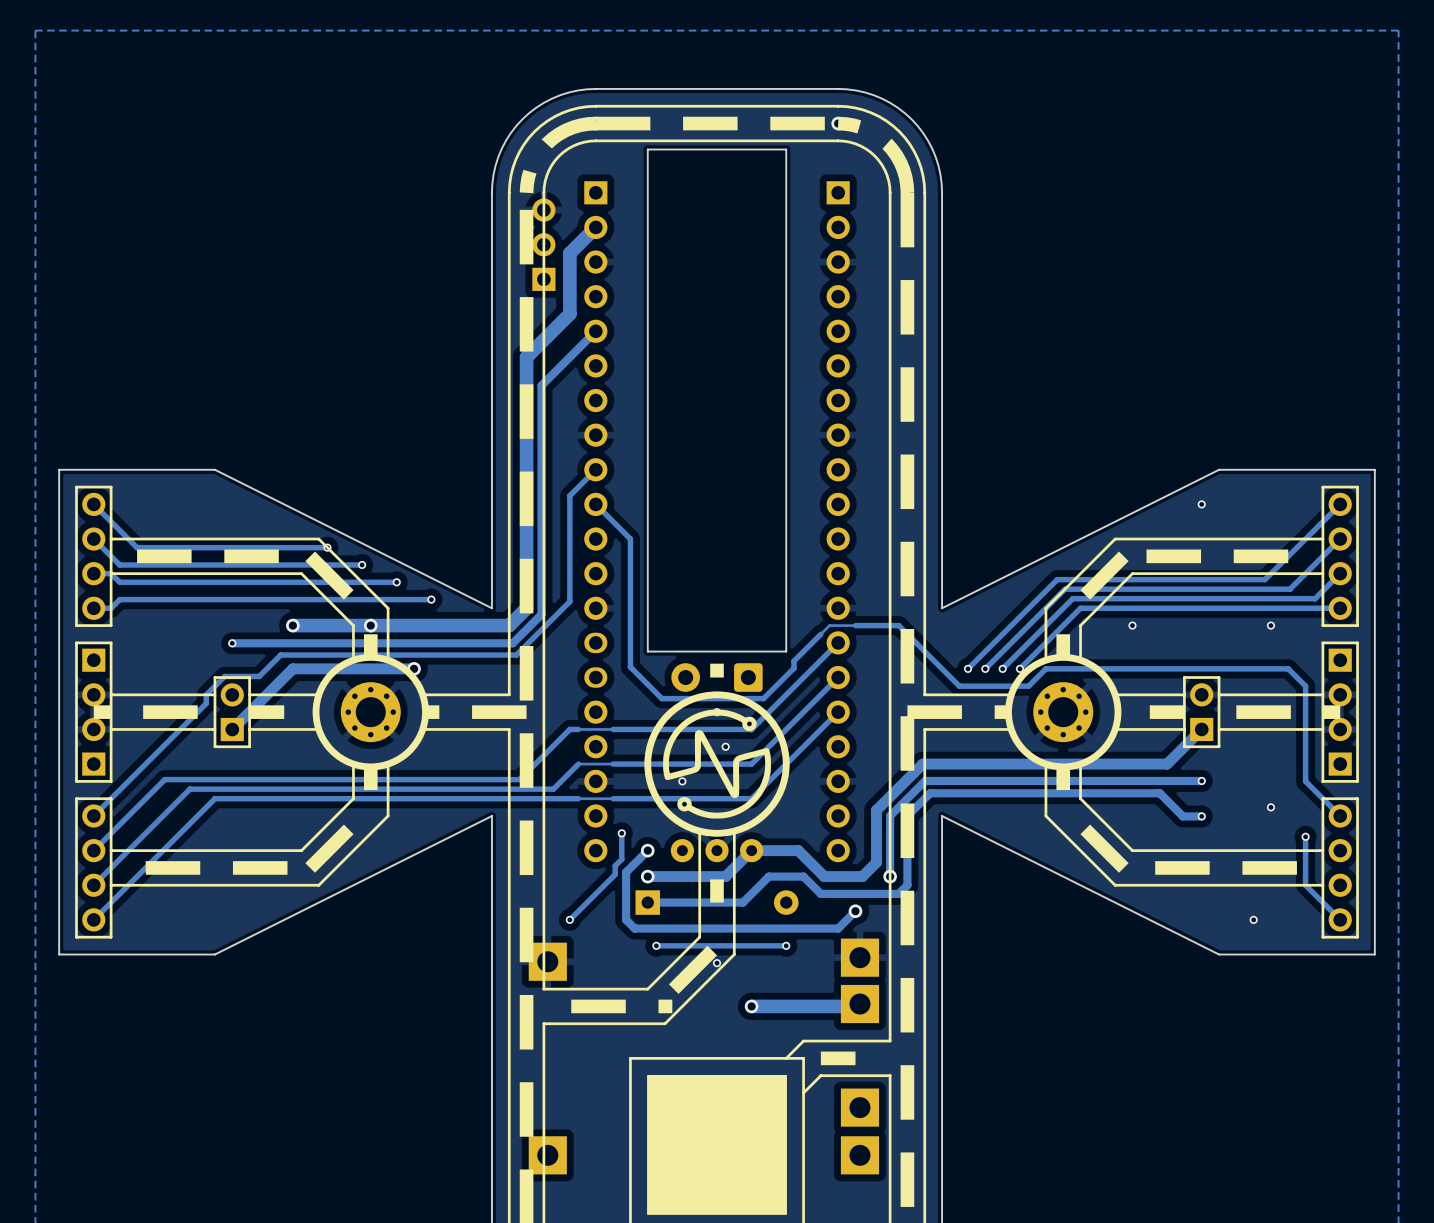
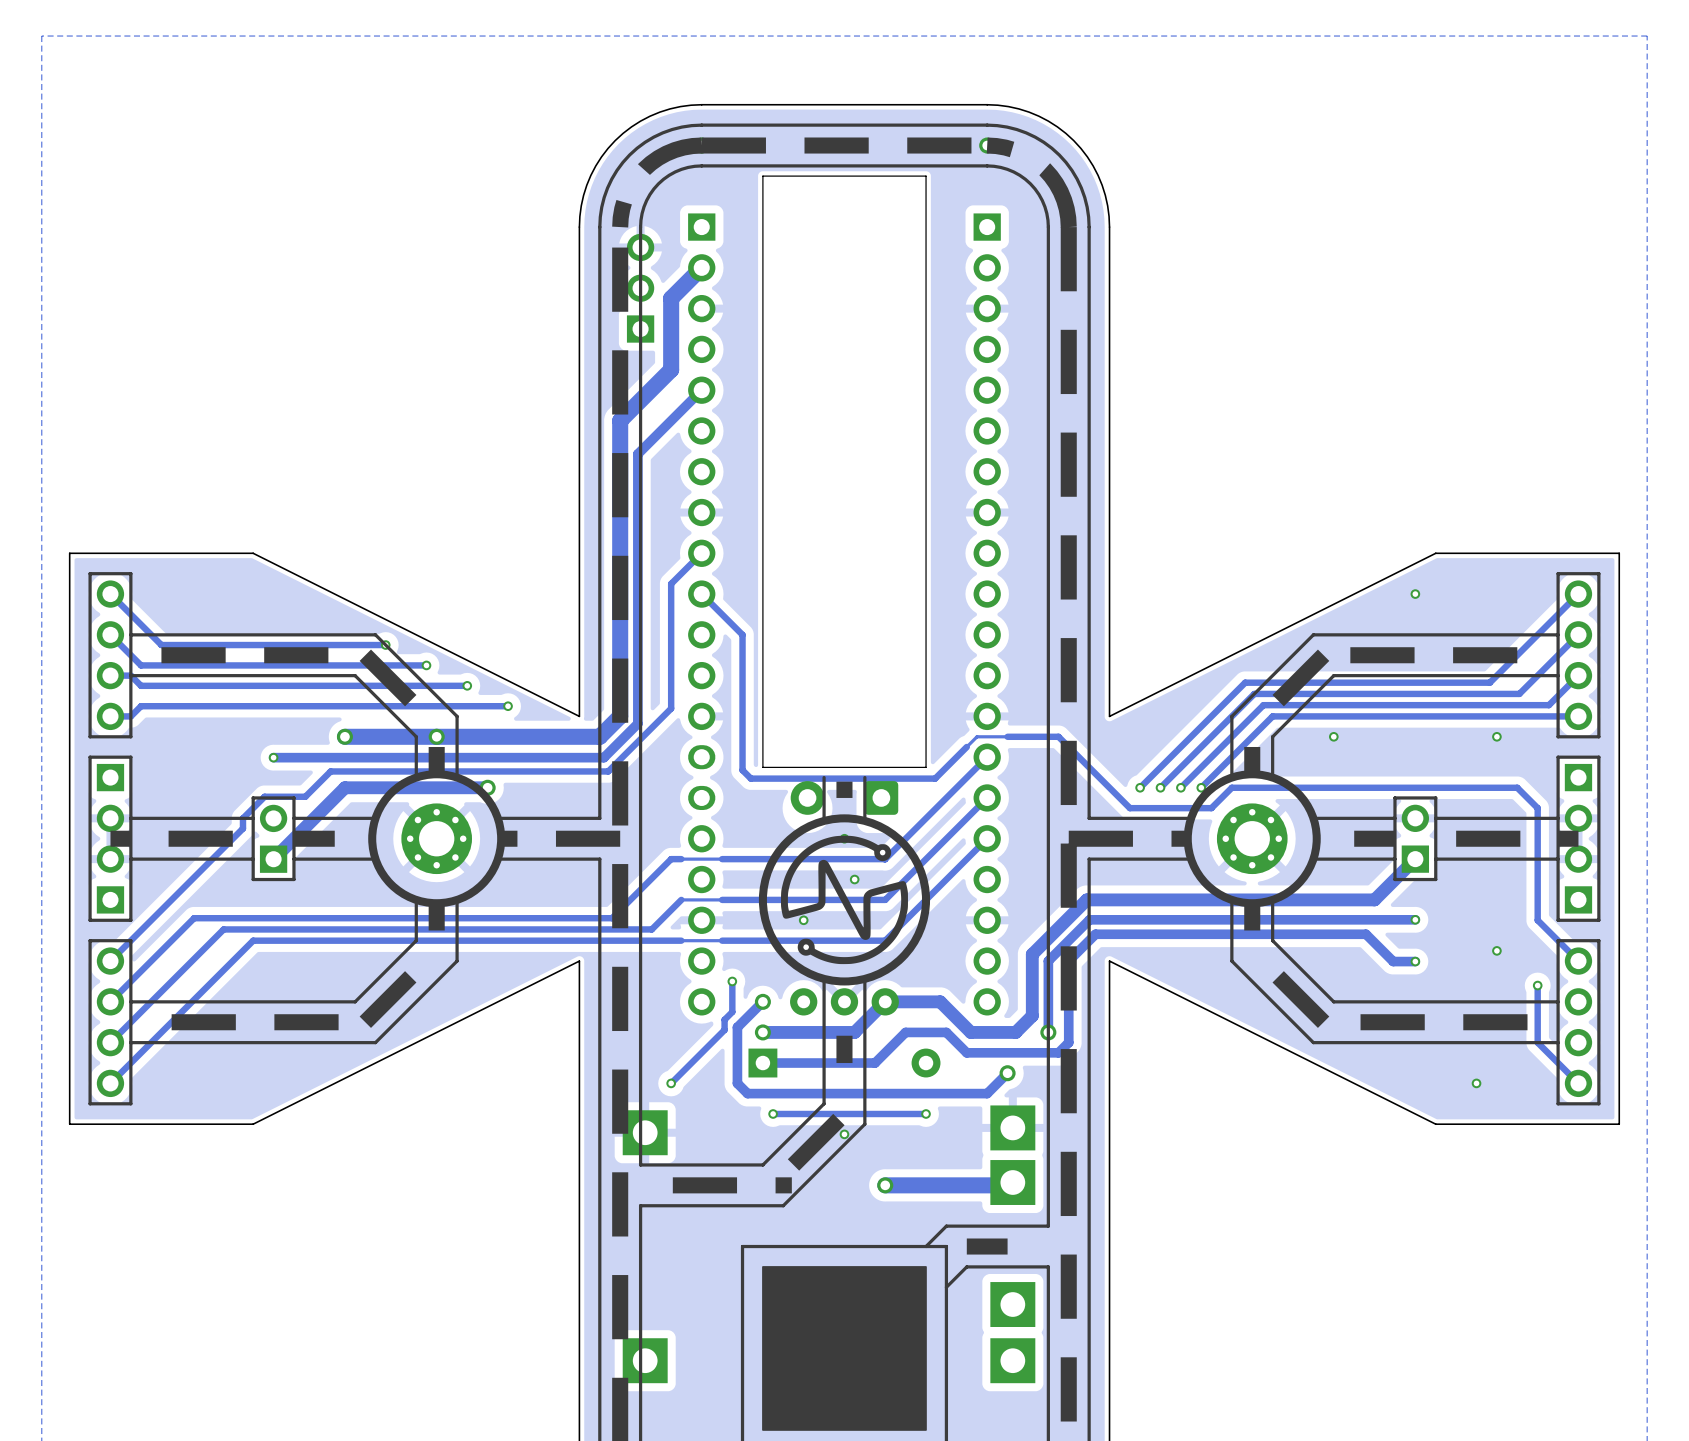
track: (630, 653) (630, 667) (661, 698) (763, 698) (794, 668) (794, 661) -> (742, 770) (750, 778) (935, 778)
line: none -> (824, 777) (824, 818)
line: none -> (864, 777) (864, 818)

